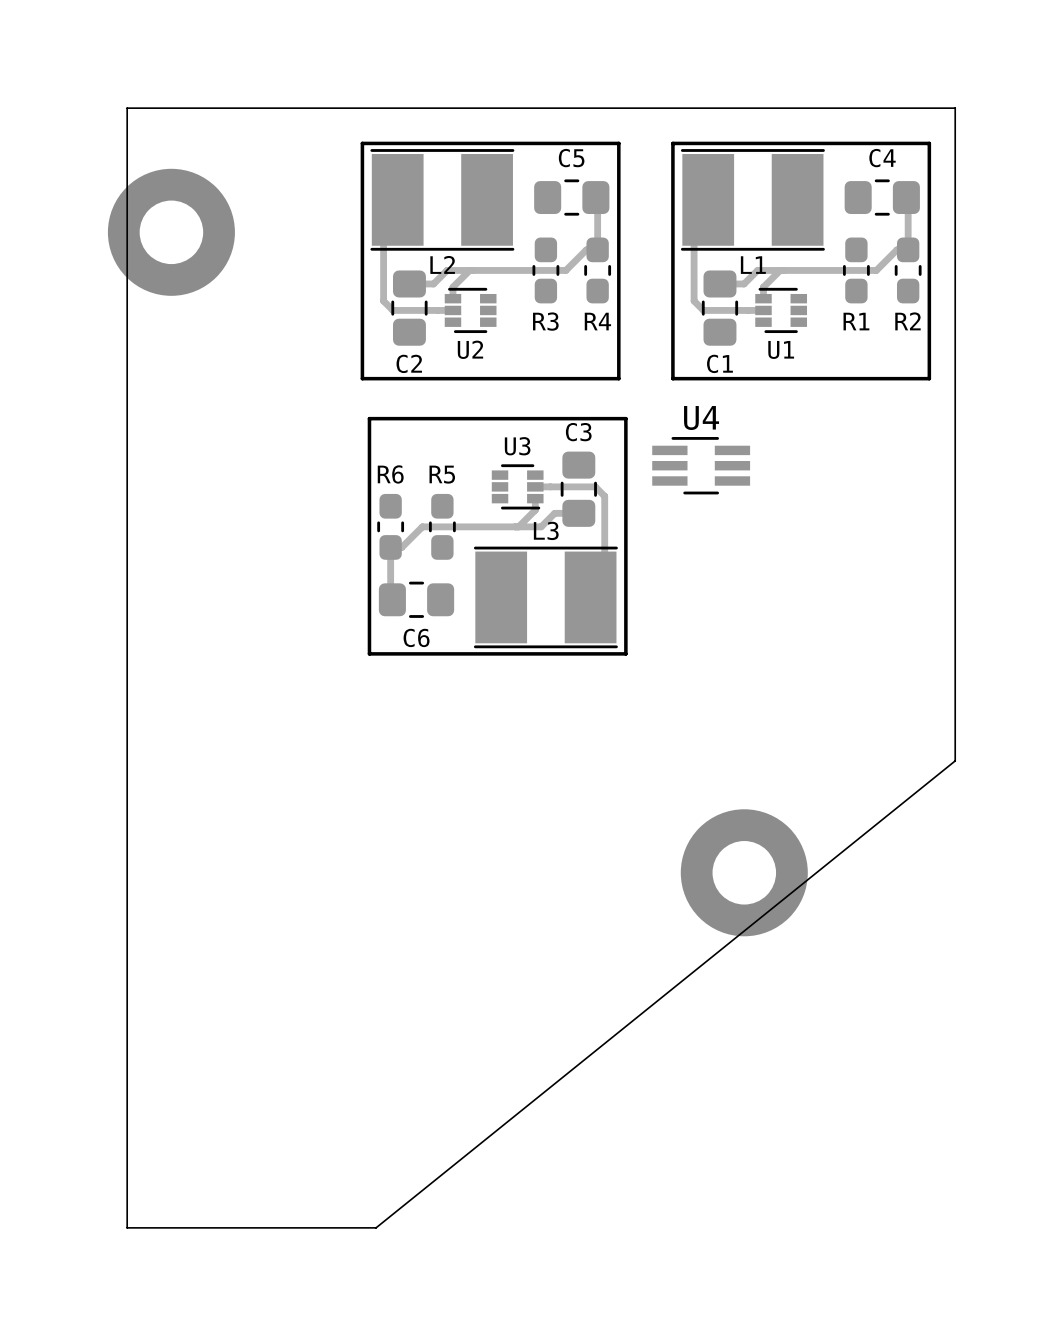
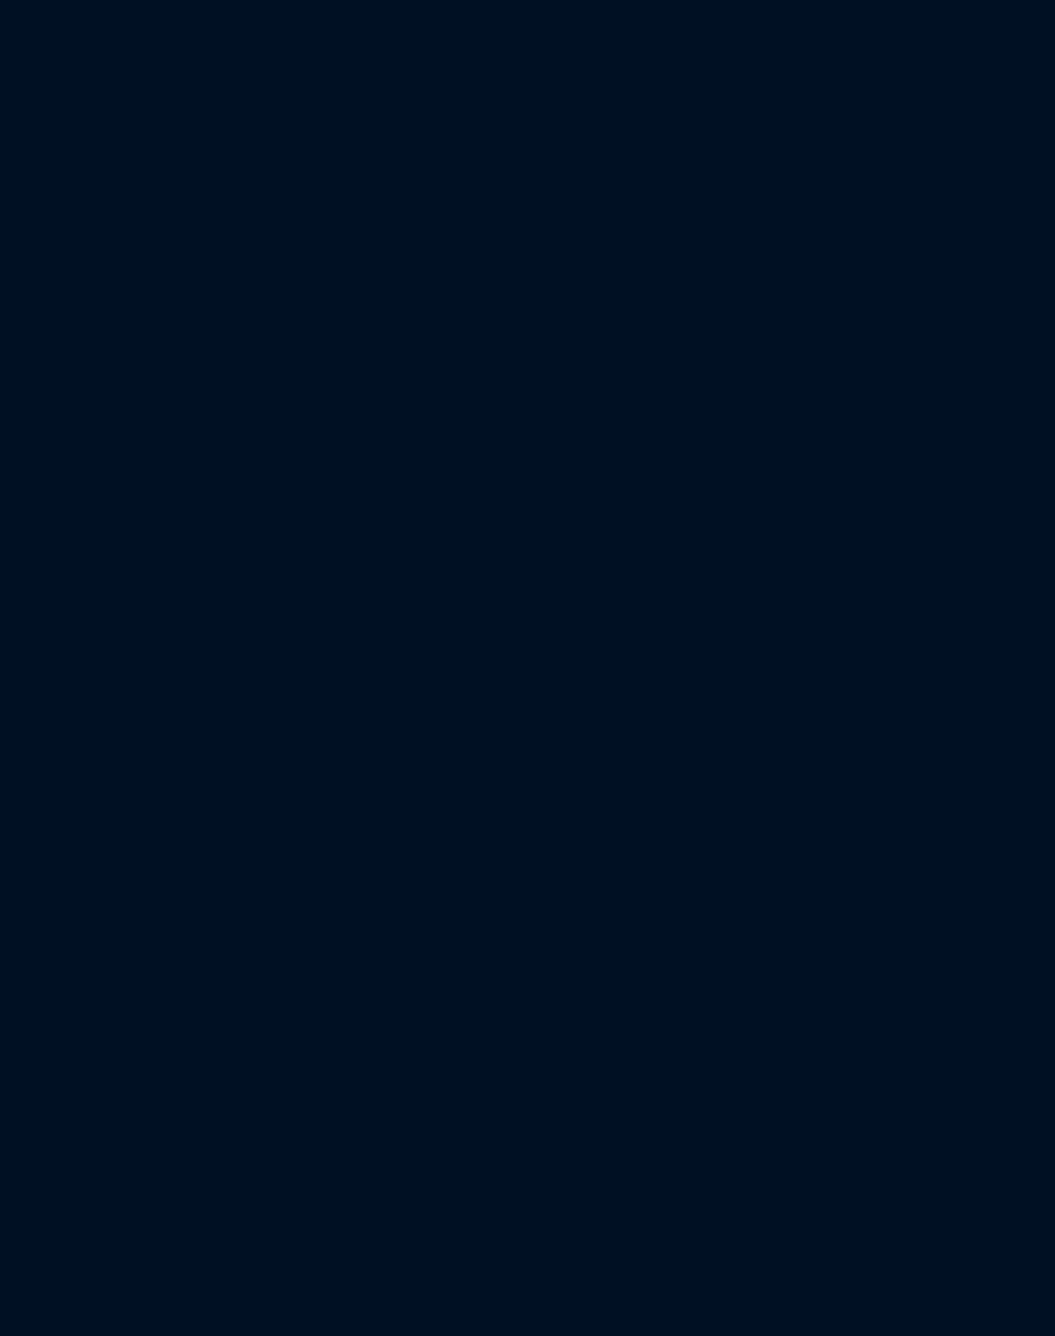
board edge: (955, 108) (955, 760) (376, 1227) (127, 1227) (127, 108) (955, 108) -> none
line: (618, 143) (362, 143) (362, 378) (618, 378) (618, 143) -> none
line: (929, 143) (672, 143) (672, 378) (929, 378) (929, 143) -> none
C5: (571, 197) -> none
track: (595, 197) (597, 199) (597, 249) (586, 249) (565, 270) (447, 270) (433, 283) (409, 283) -> none
C4: (882, 197) -> none
track: (906, 197) (908, 199) (908, 249) (896, 249) (876, 270) (757, 270) (744, 283) (719, 283) -> none
track: (397, 199) (383, 214) (383, 301) (392, 310) (452, 310) -> none
L2: (442, 199) -> none
track: (708, 199) (694, 214) (694, 301) (703, 310) (763, 310) -> none
L1: (752, 199) -> none
part: (171, 232) -> none
track: (469, 270) (452, 287) (452, 298) -> none
R3: (545, 270) -> none
R4: (597, 270) -> none
track: (780, 270) (763, 287) (763, 298) -> none
R1: (856, 270) -> none
R2: (908, 270) -> none
C2: (409, 308) -> none
C1: (719, 308) -> none
U2: (470, 310) -> none
U1: (781, 310) -> none
line: (625, 418) (625, 653) (369, 653) (369, 418) (625, 418) -> none
U4: (701, 465) -> none
U3: (517, 486) -> none
track: (535, 486) (595, 486) (604, 496) (604, 583) (590, 597) -> none
C3: (578, 489) -> none
track: (535, 498) (535, 510) (518, 526) -> none
track: (578, 513) (554, 513) (541, 526) (422, 526) (401, 547) (390, 547) (390, 598) (392, 599) -> none
R6: (390, 526) -> none
R5: (442, 526) -> none
L3: (545, 597) -> none
C6: (416, 599) -> none
part: (744, 872) -> none

